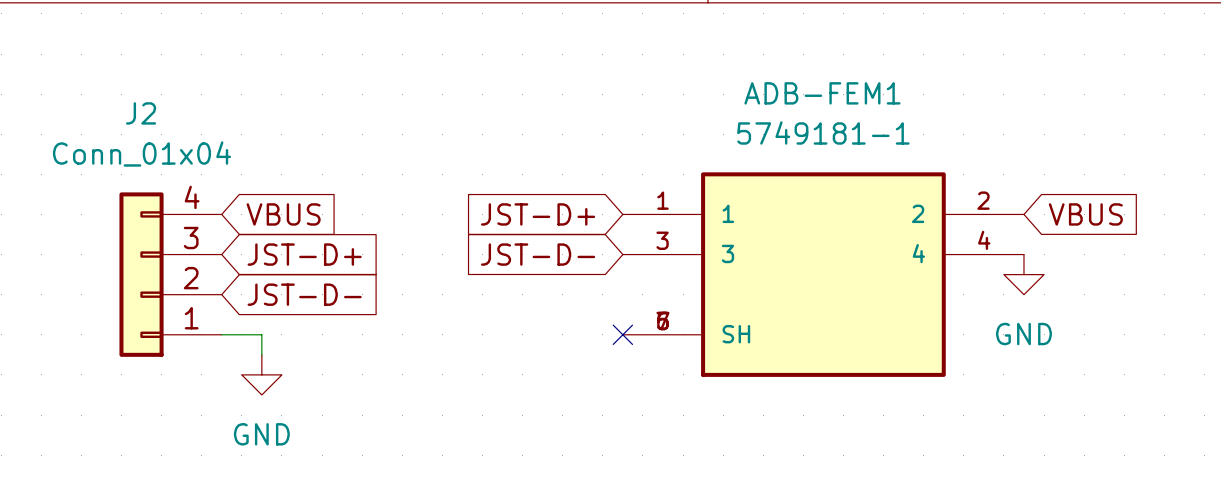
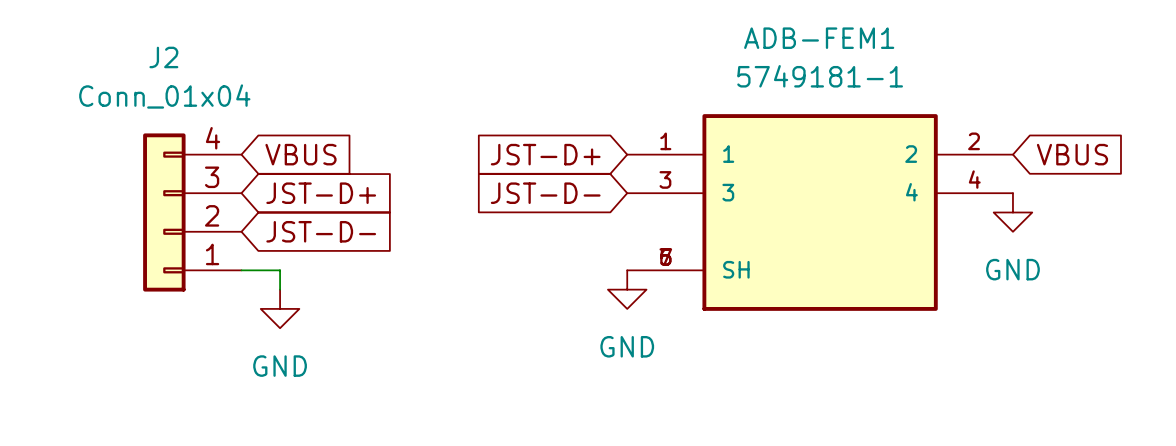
no-connect mark: (622, 334) -> none
power symbol: none -> GND (627, 289)

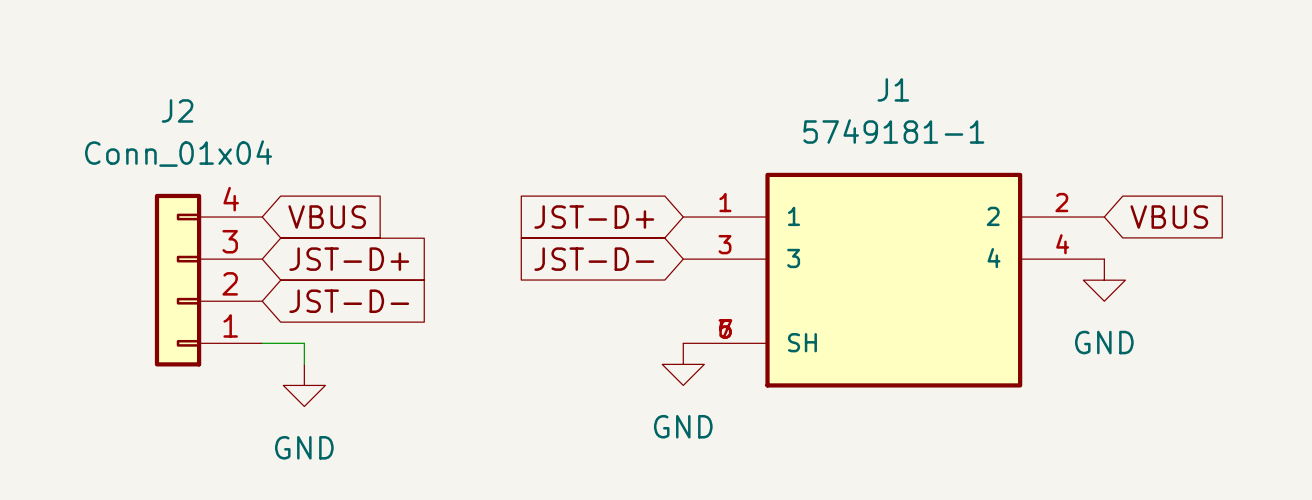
ADB-FEM1 name: ADB-FEM1 (819, 38) -> J1 (893, 89)

